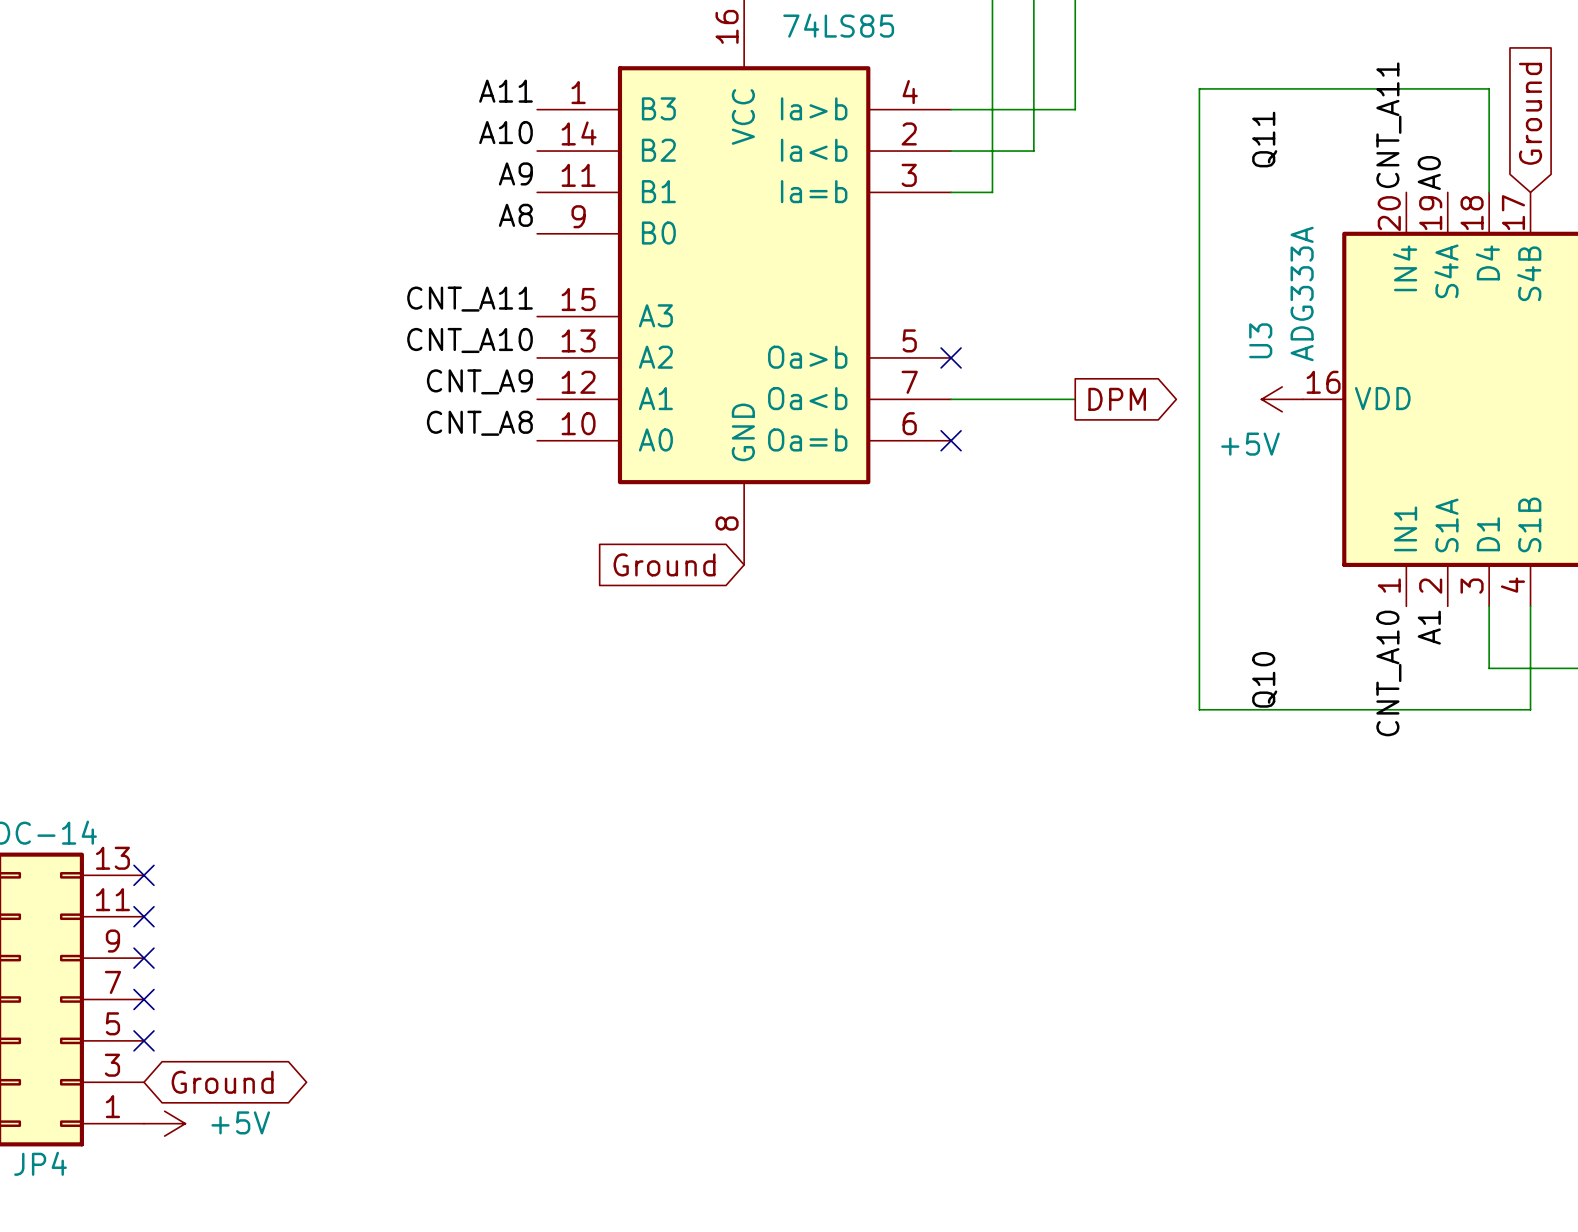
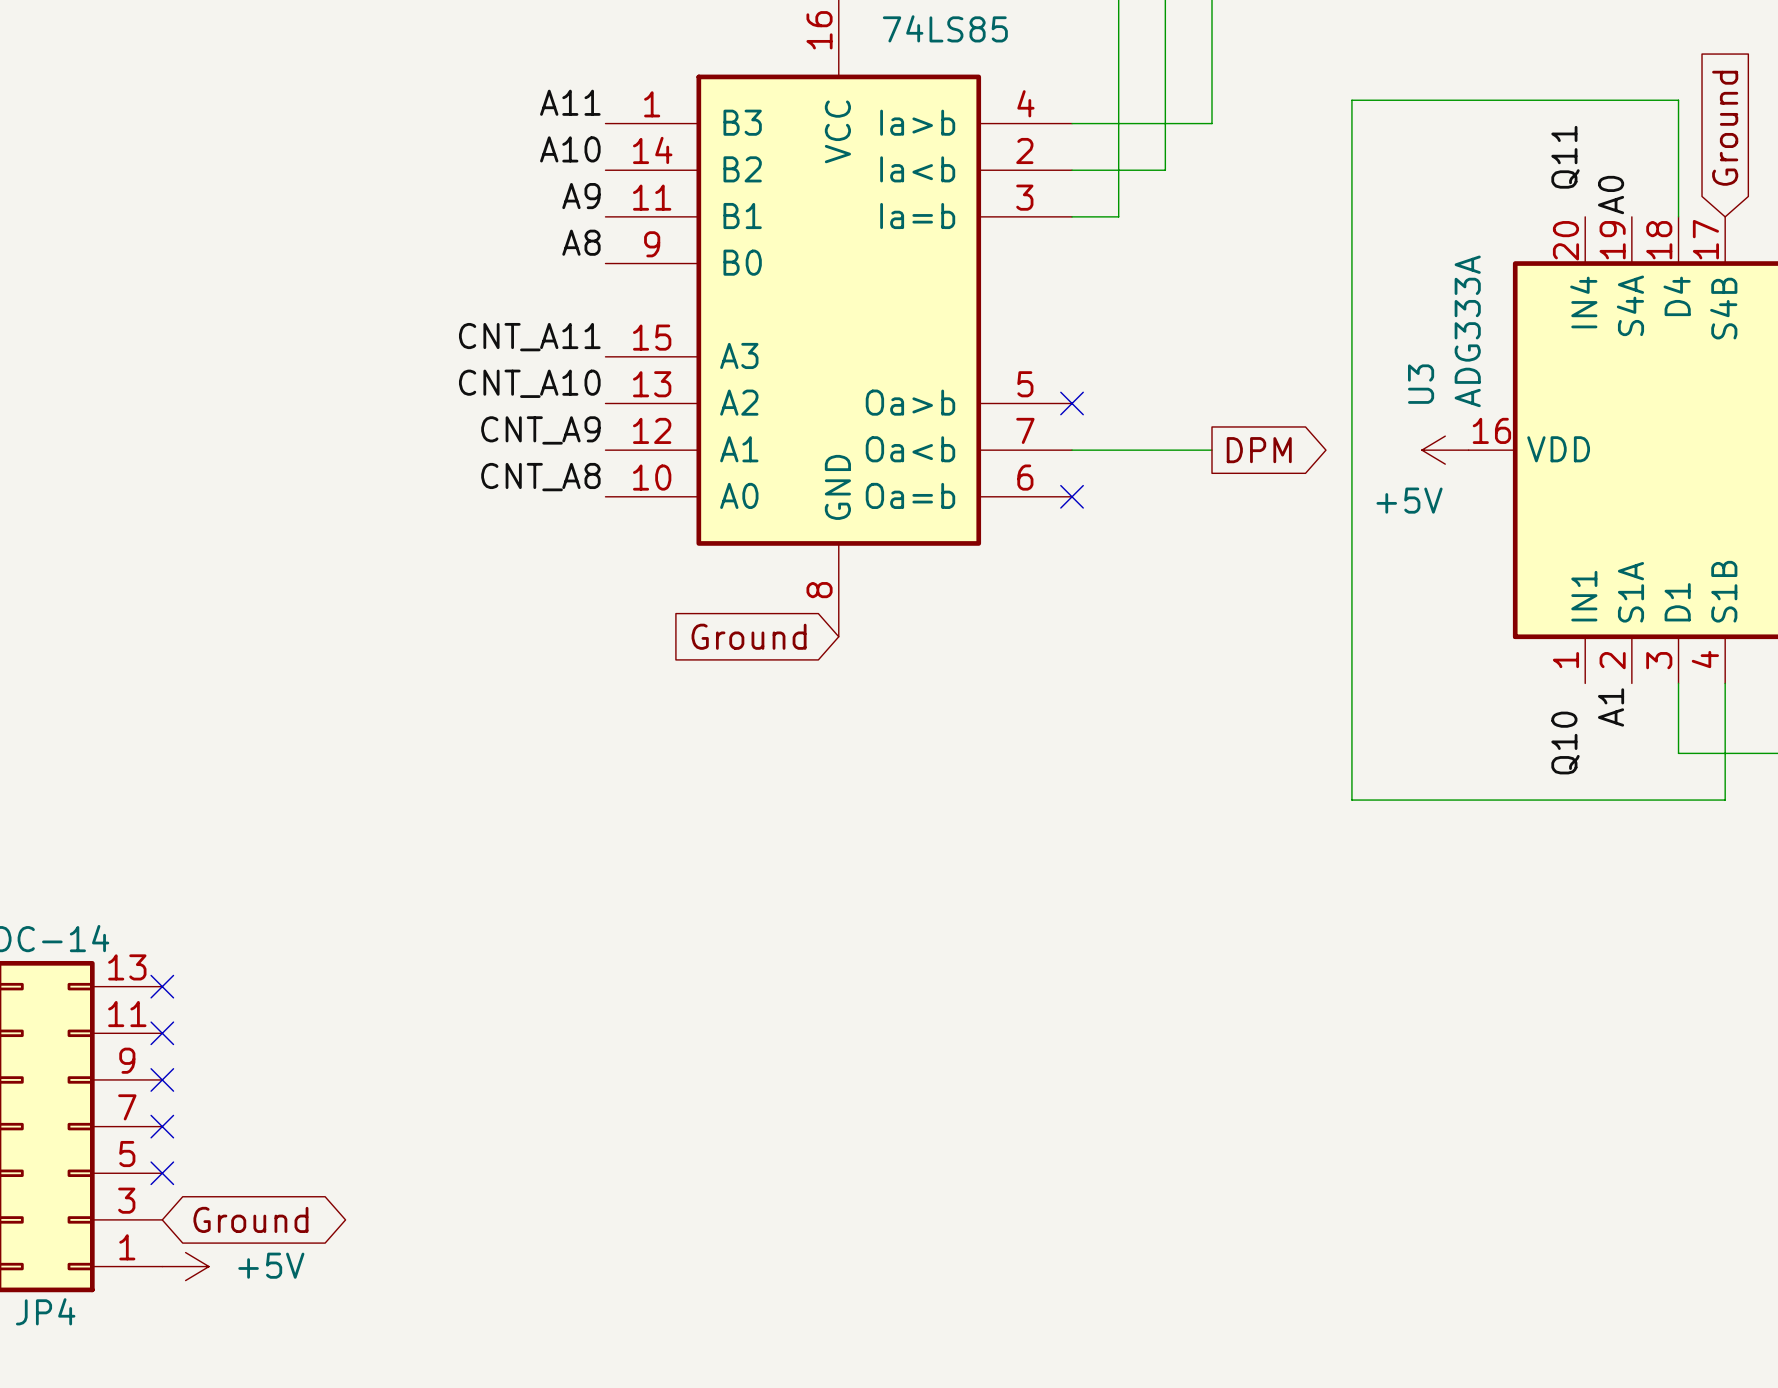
label: CNT_A11 (1388, 125) -> none
label position: Q11 (1264, 139) -> Q11 (1565, 157)
label: CNT_A10 (1388, 673) -> none
label position: Q10 (1264, 679) -> Q10 (1565, 743)

